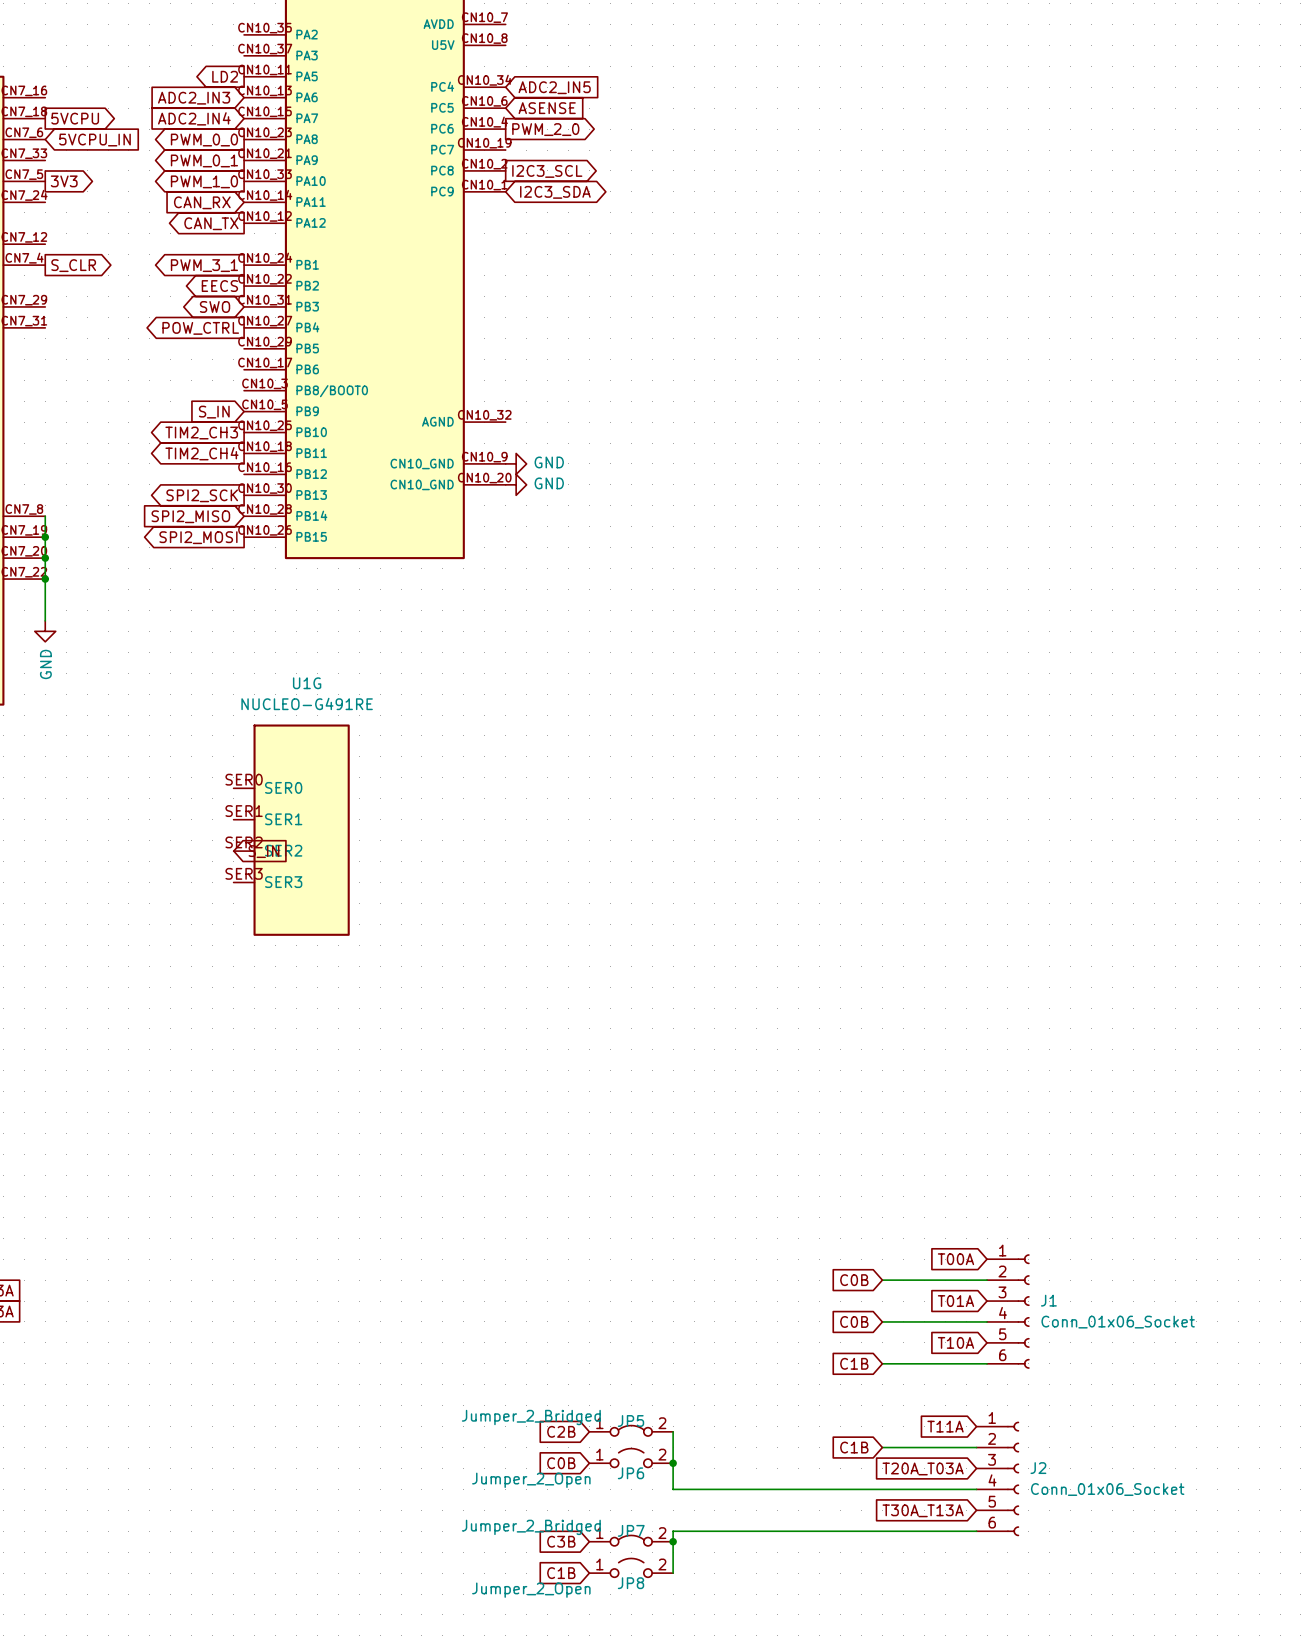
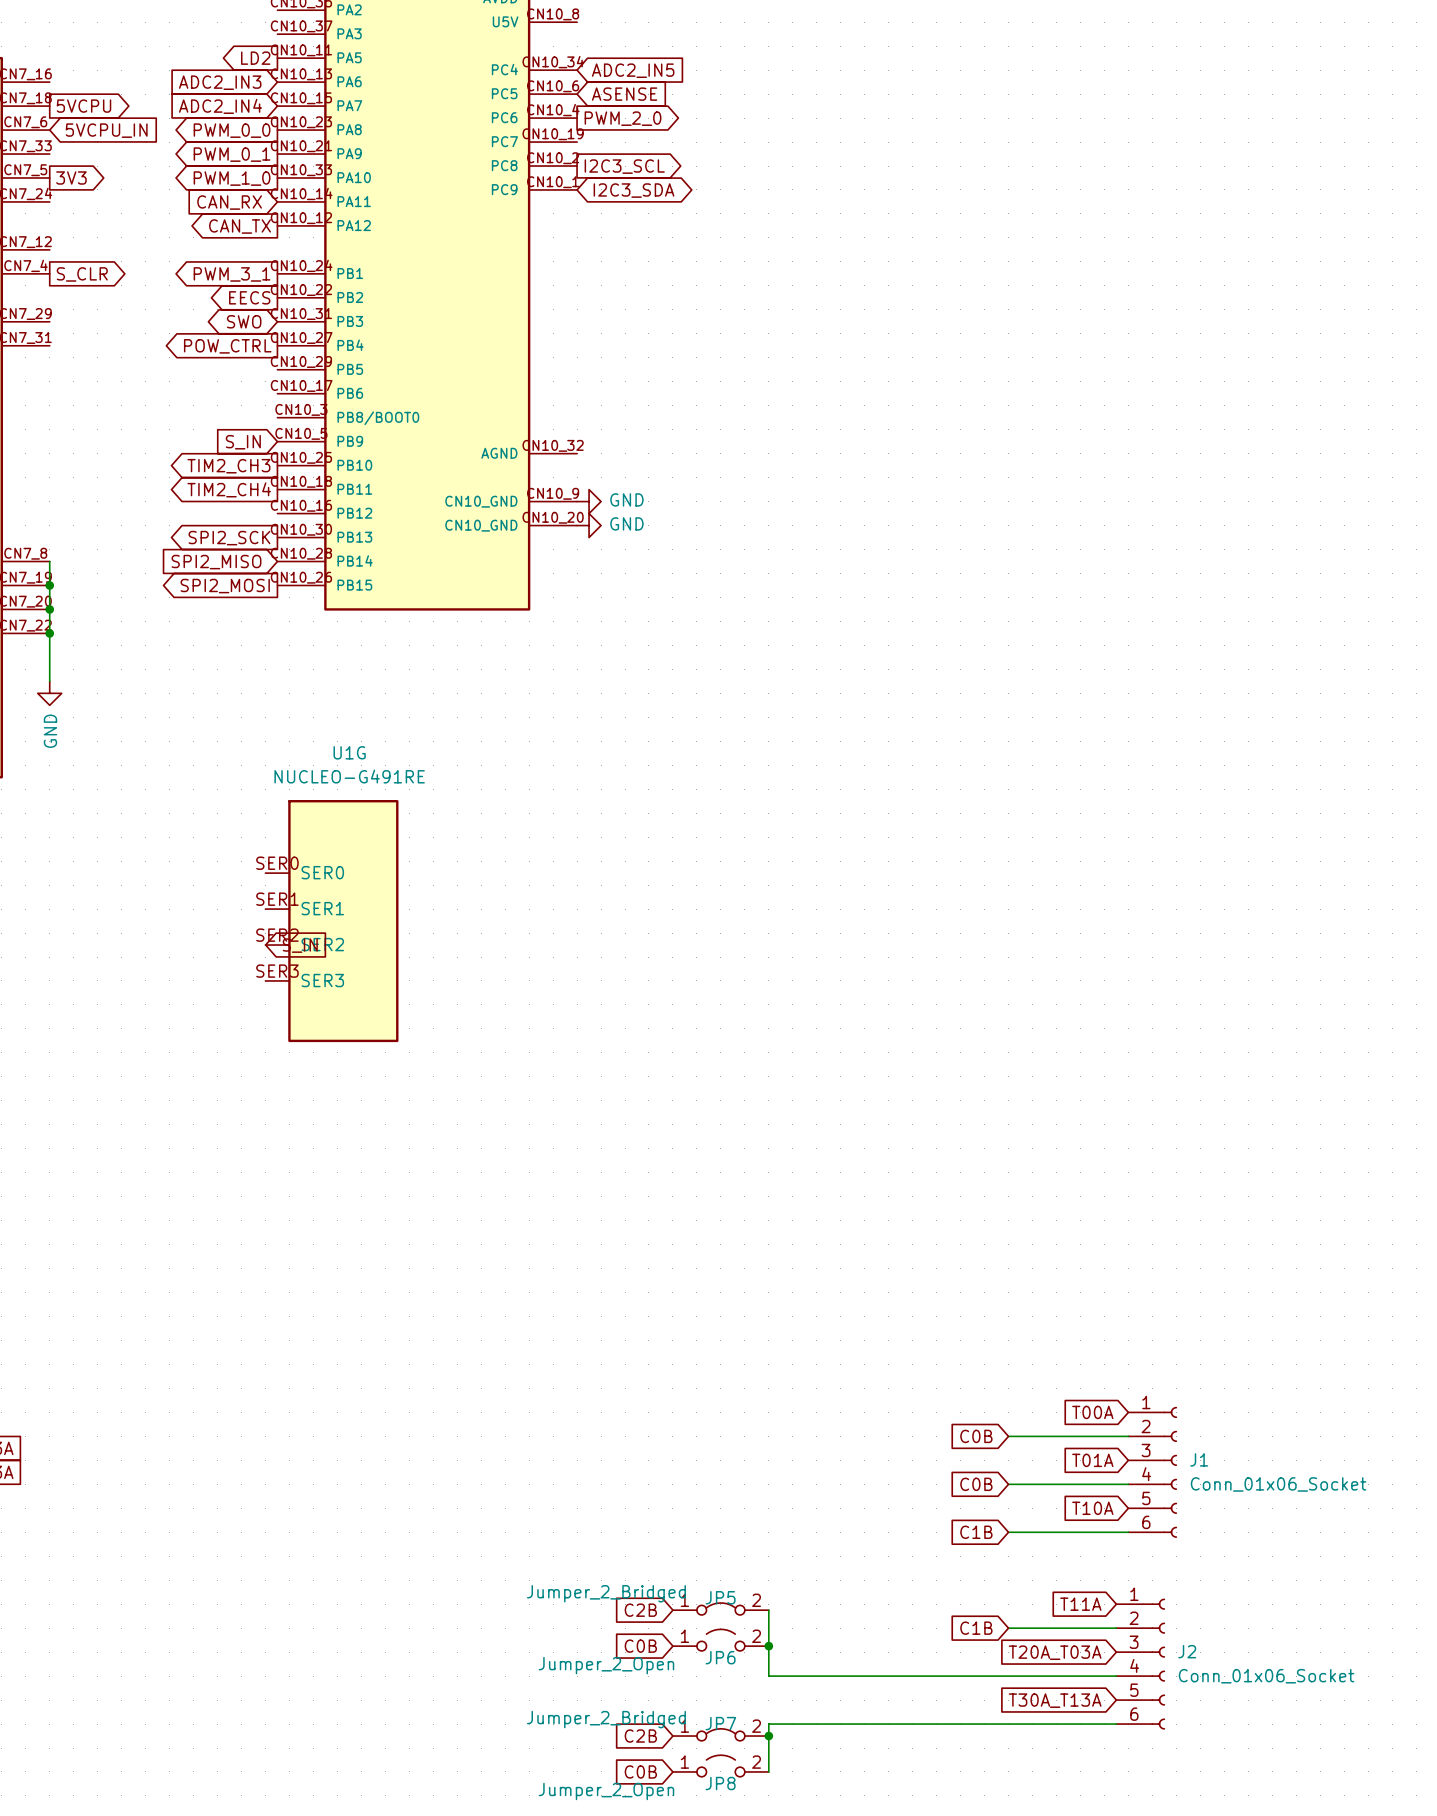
global label: C3B (561, 1541) -> C2B (640, 1736)
global label: C1B (561, 1573) -> C0B (640, 1771)

